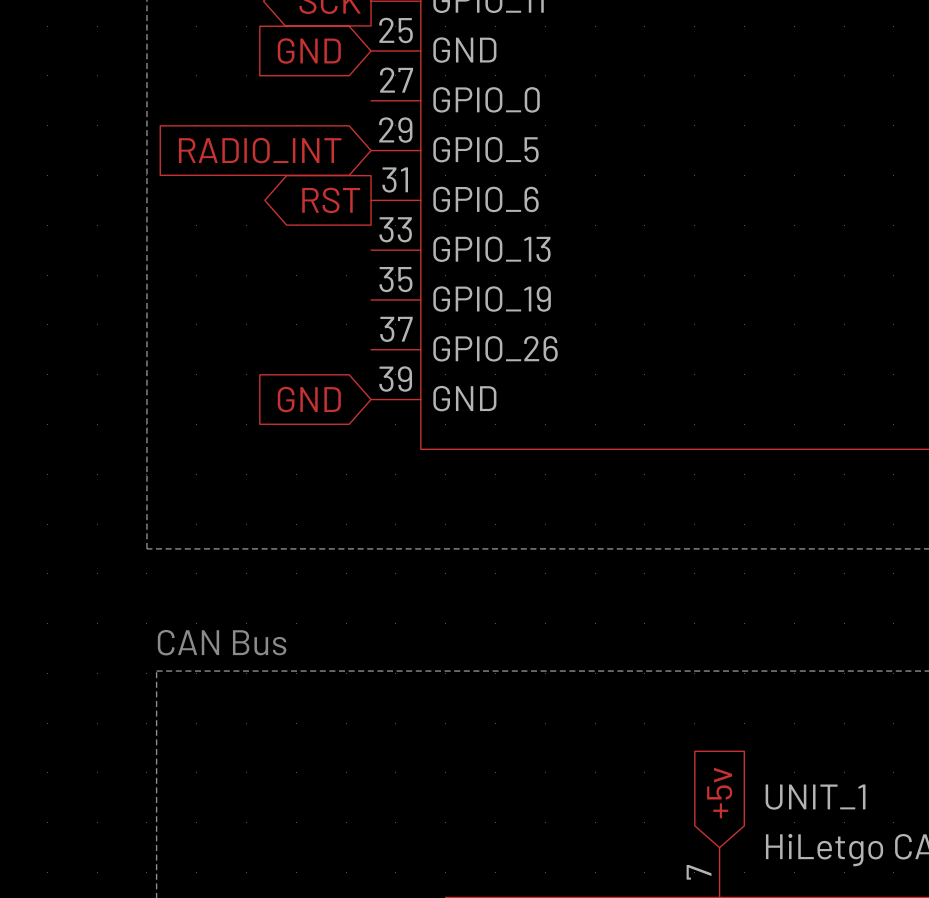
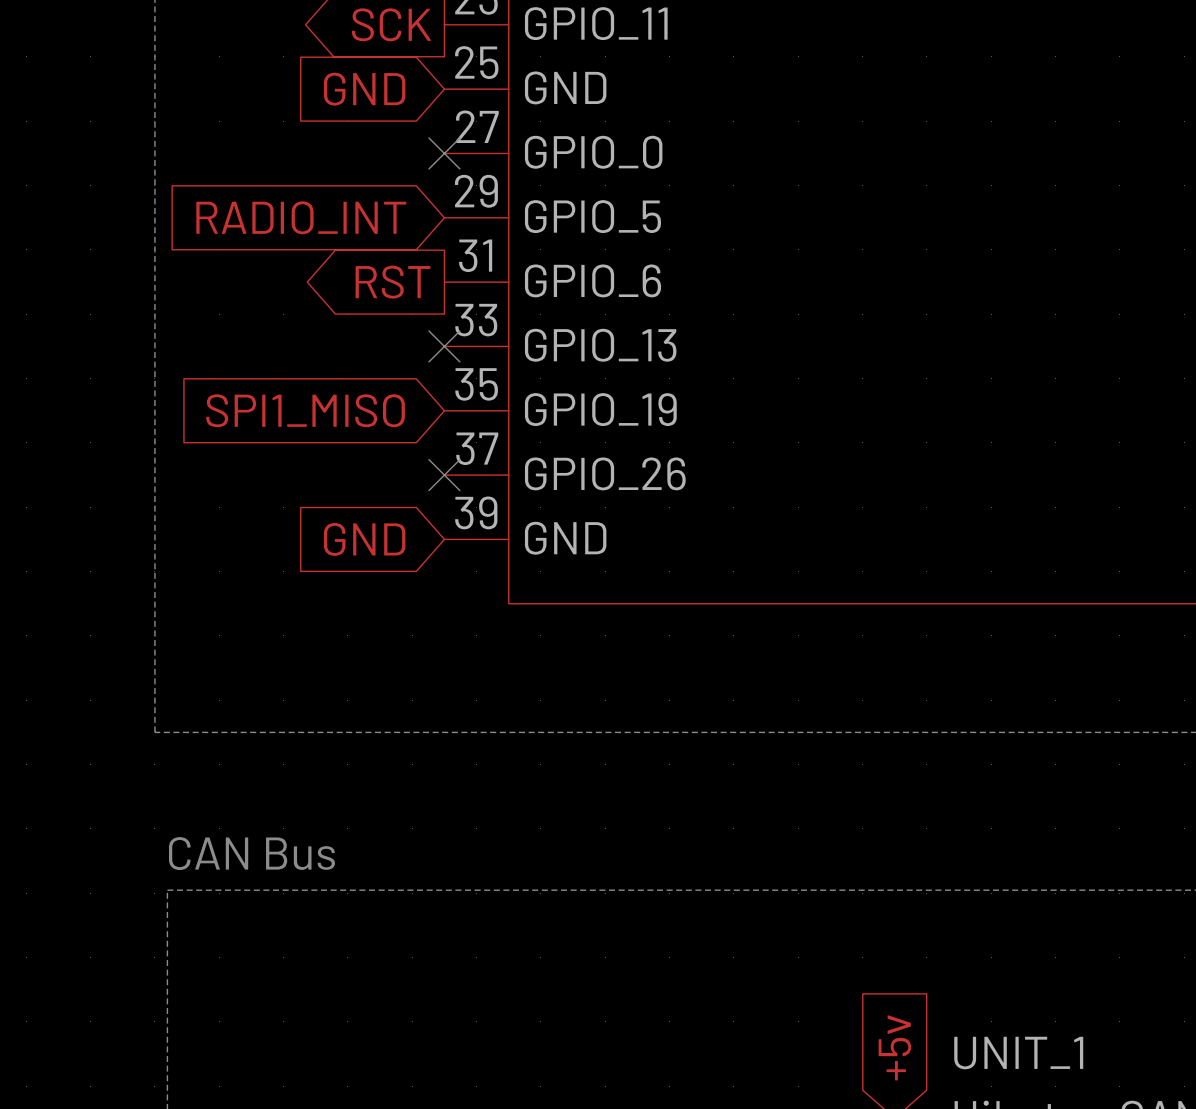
no-connect mark: none -> (444, 153)
no-connect mark: none -> (444, 346)
global label: none -> SPI1_MISO (305, 410)
no-connect mark: none -> (444, 475)

